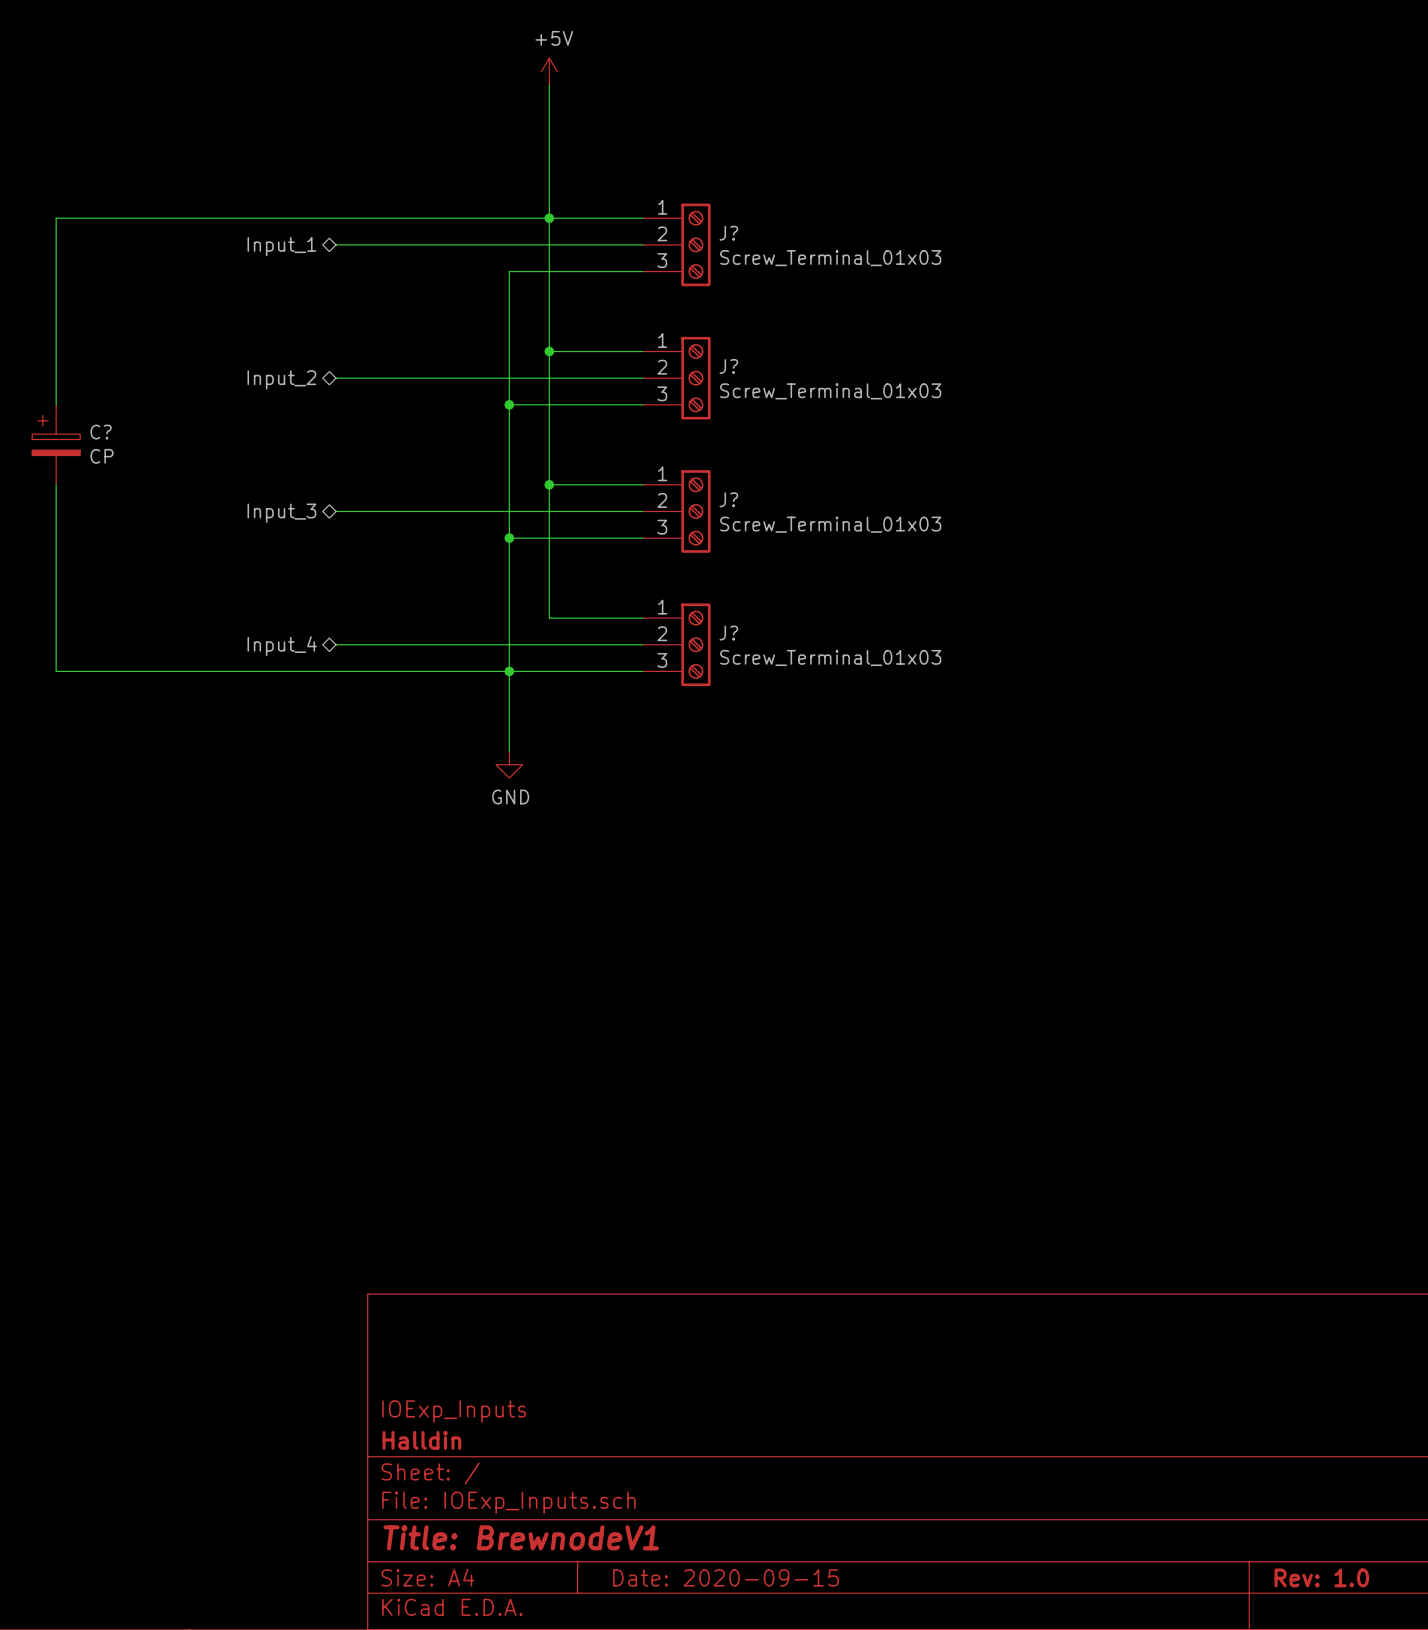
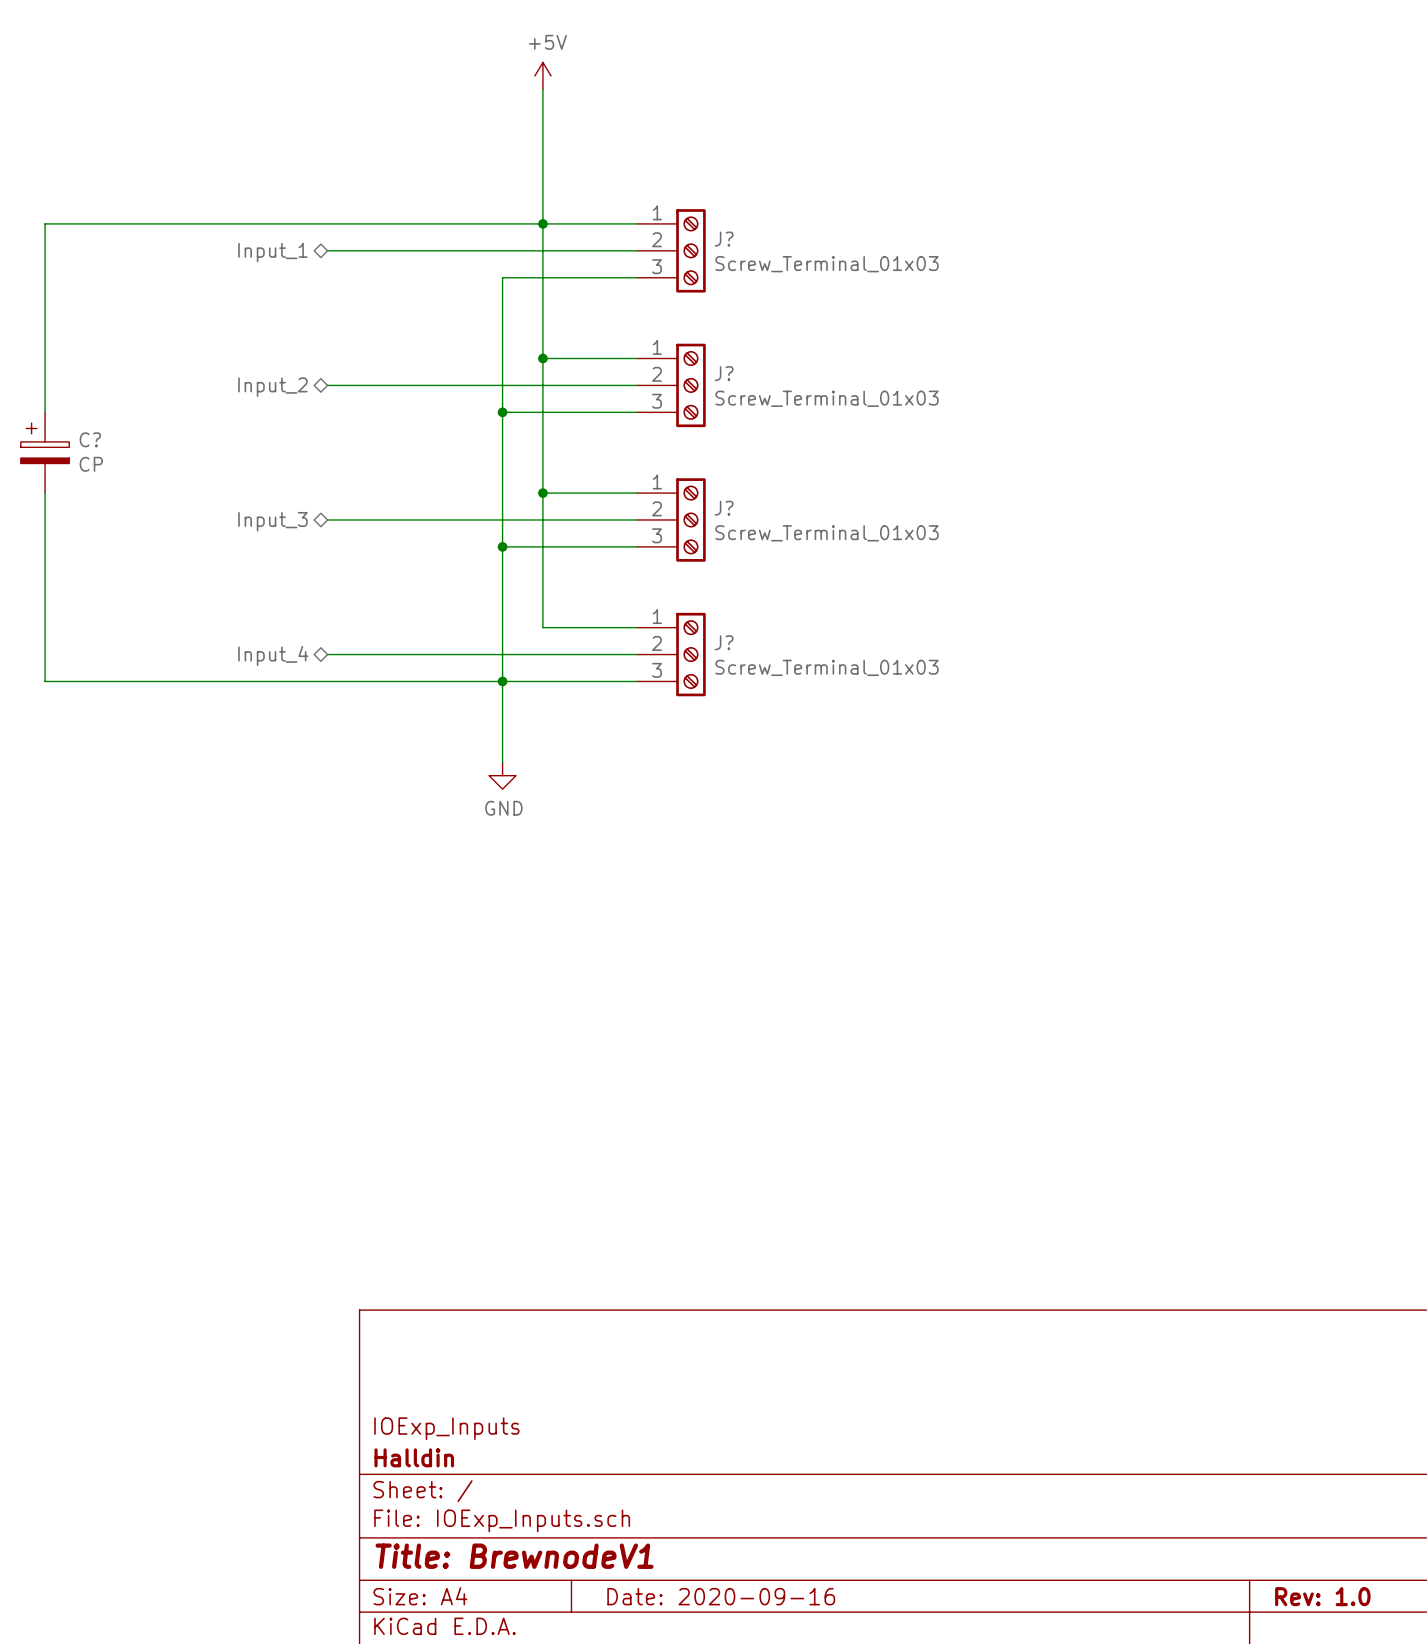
title block: Date: 2020-09-15 (725, 1577) -> Date: 2020-09-16 (721, 1596)

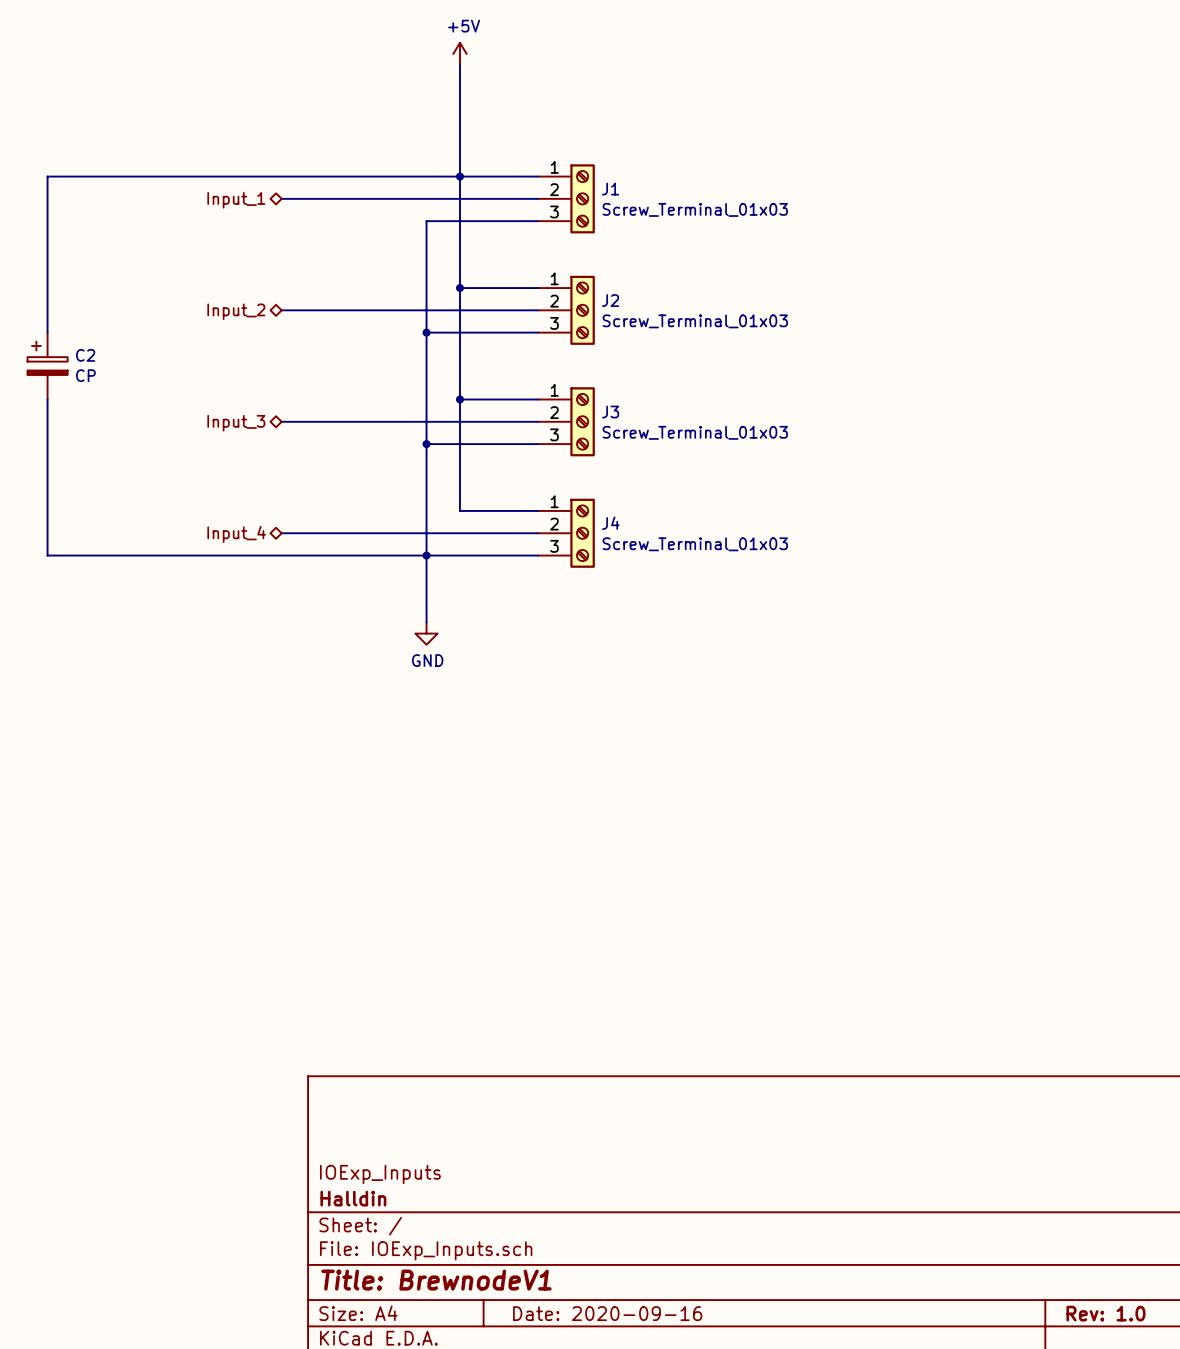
J? name: J? (724, 239) -> J1 (610, 189)
J? name: J? (724, 373) -> J2 (610, 300)
C? name: C? (90, 439) -> C2 (85, 355)
J? name: J? (724, 508) -> J3 (610, 412)
J? name: J? (724, 642) -> J4 (610, 523)

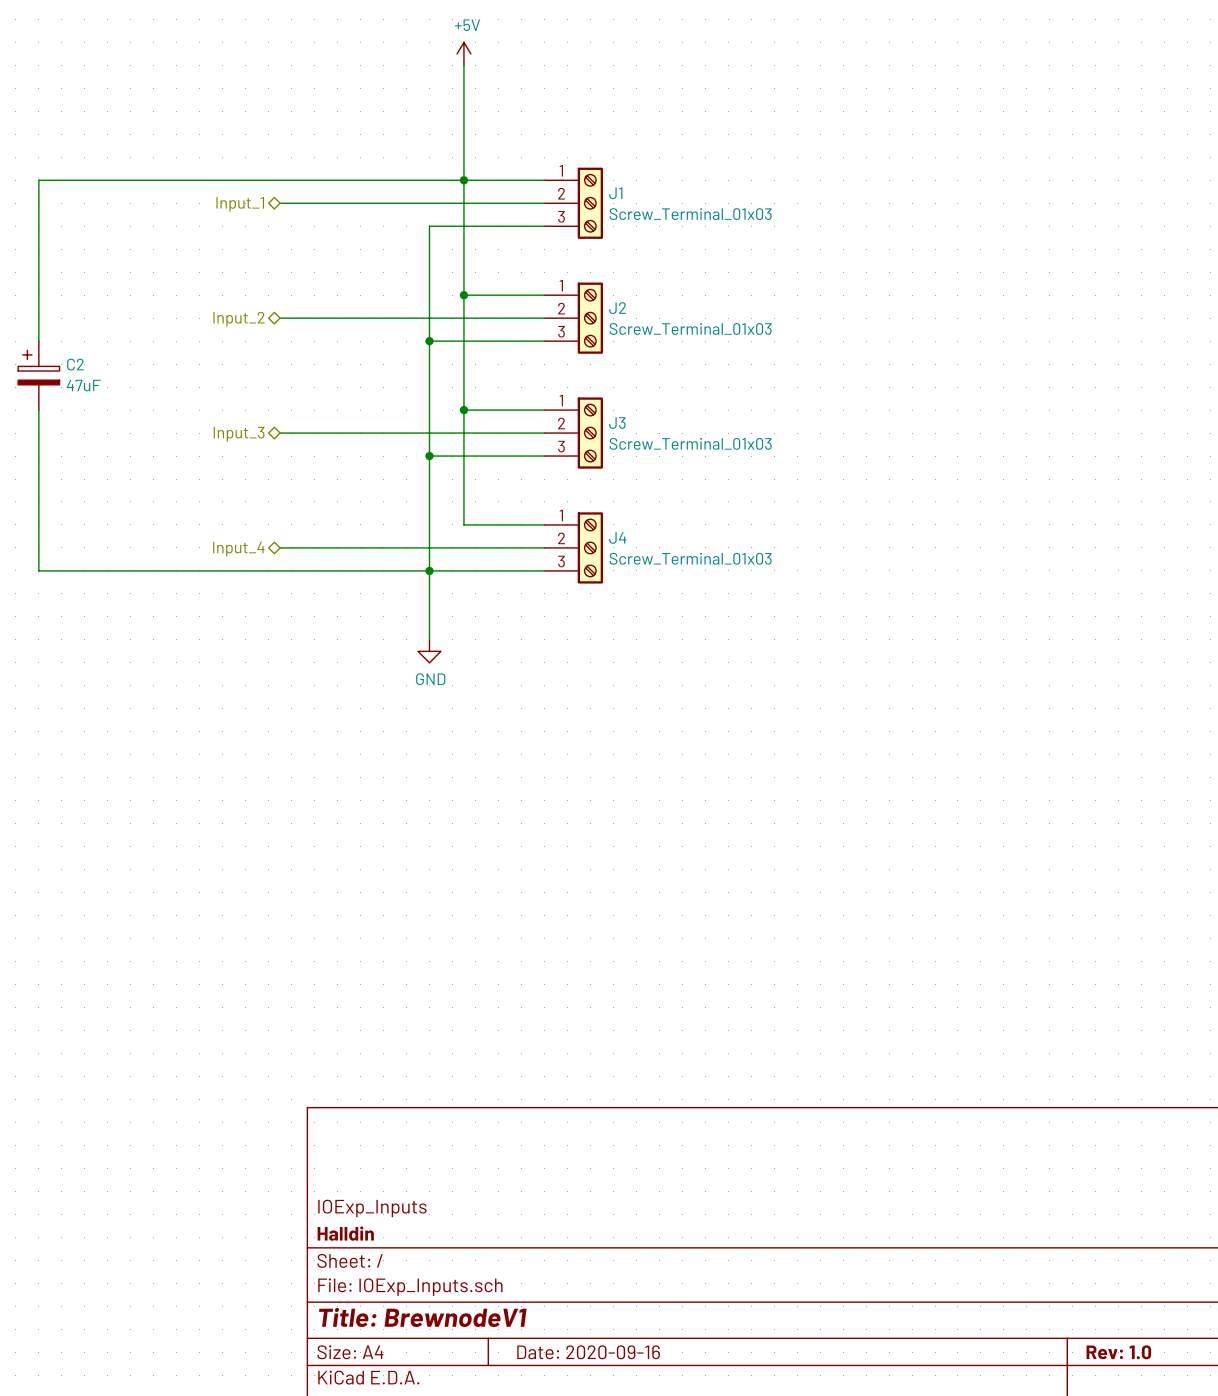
C2 value: CP (85, 375) -> 47uF (83, 385)

